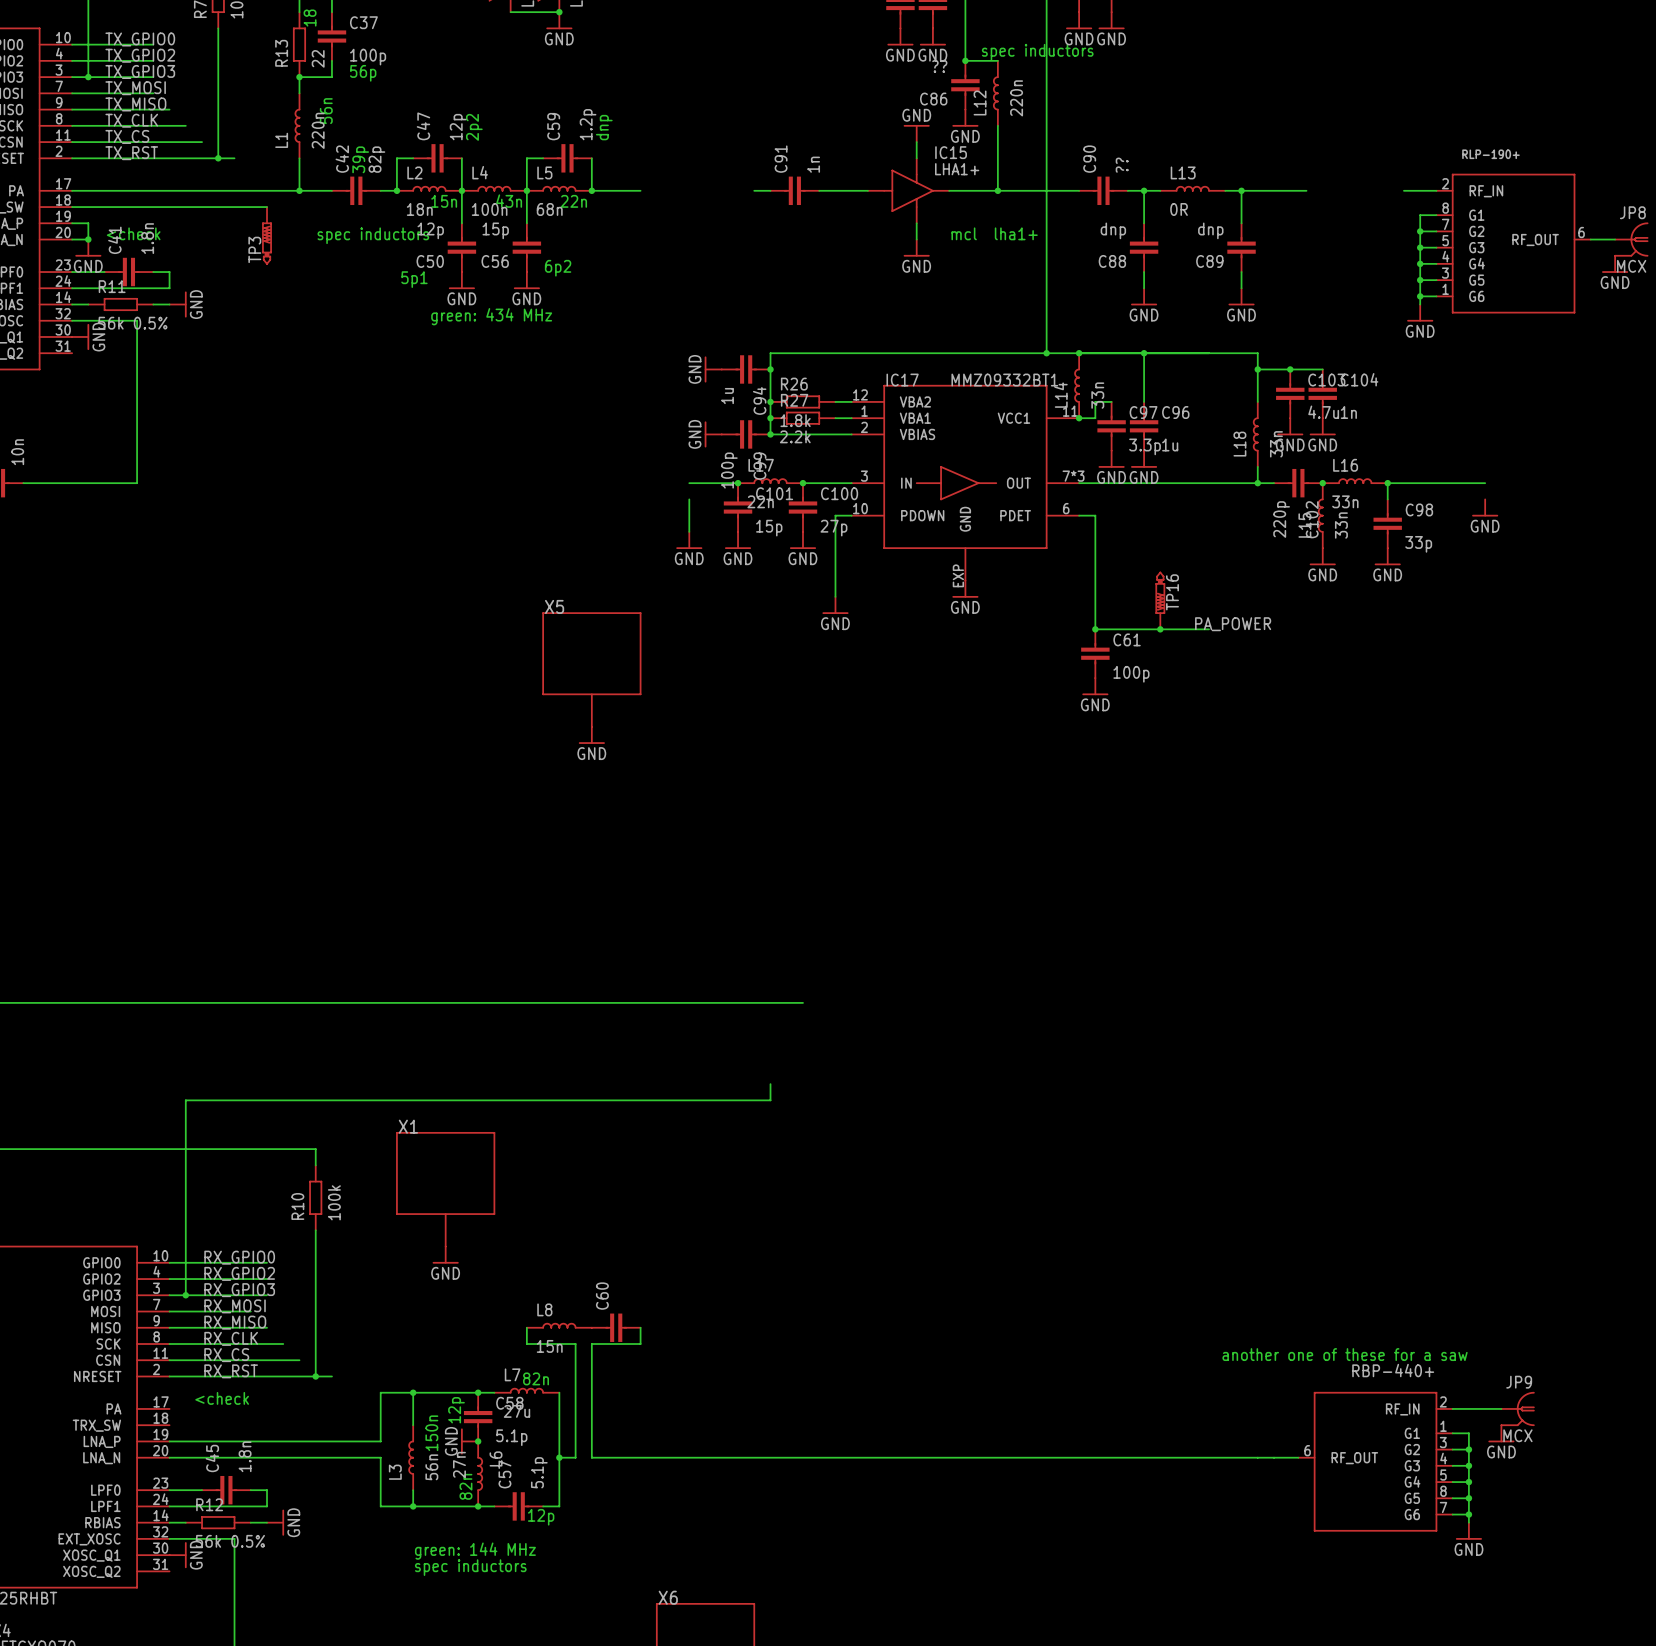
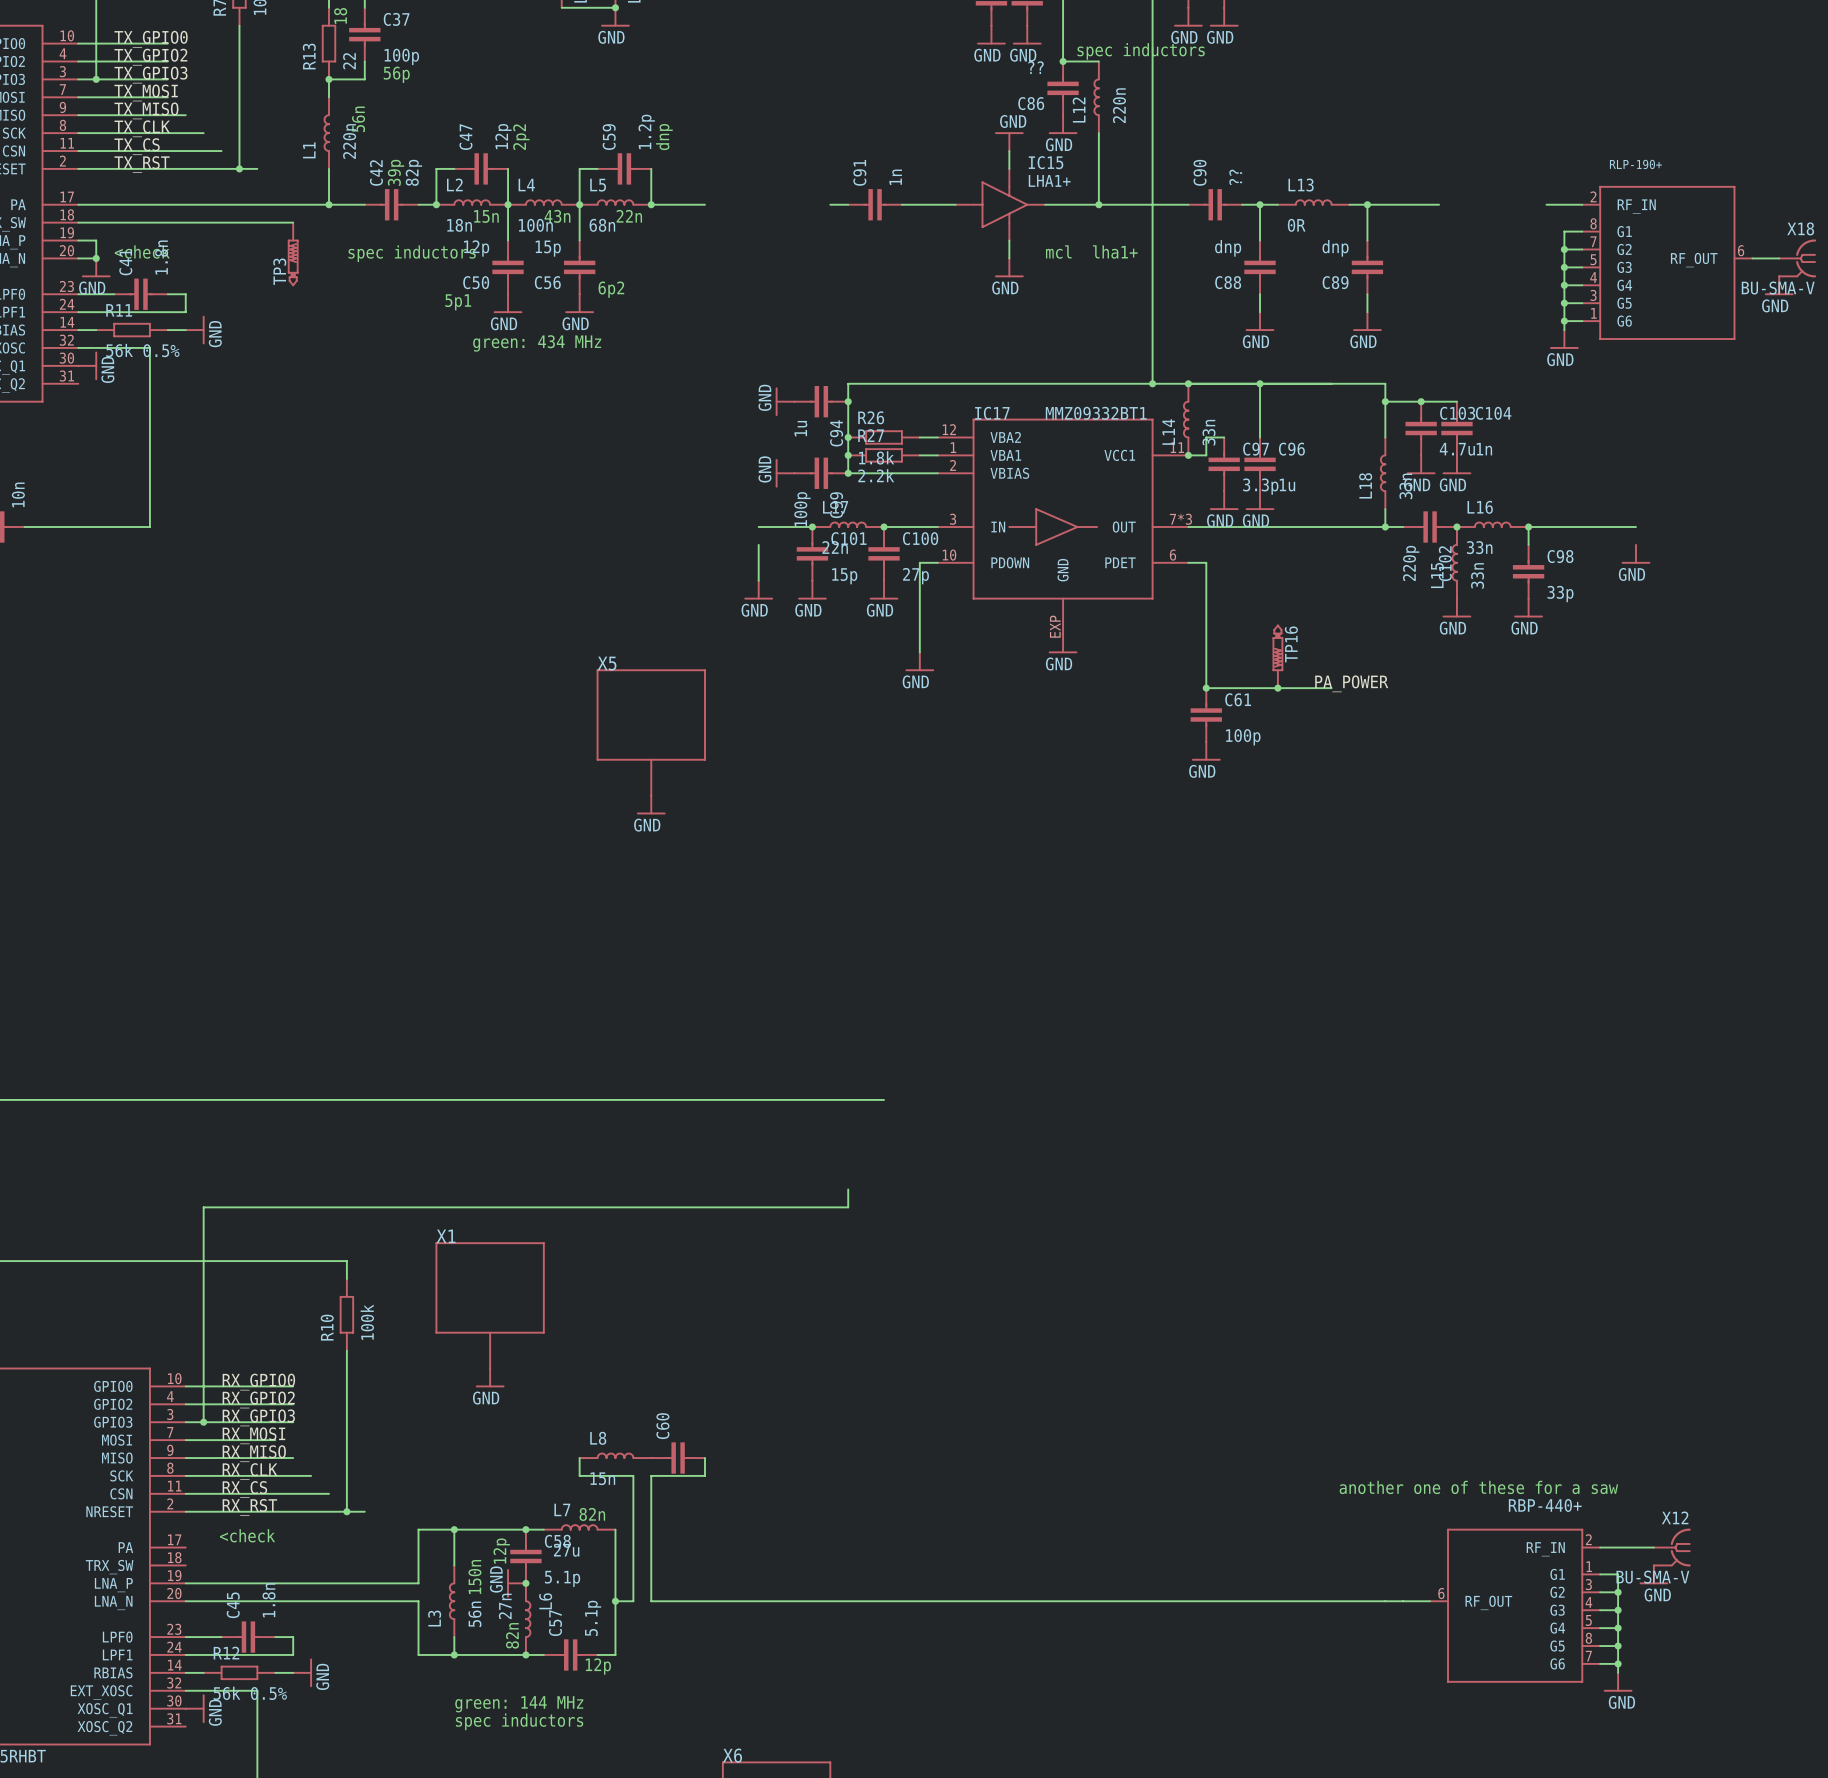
JP8: MCX (1631, 239) -> none
X18: none -> BU-SMA-V (1797, 258)
JP9: MCX (1518, 1408) -> none
X12: none -> BU-SMA-V (1672, 1547)

